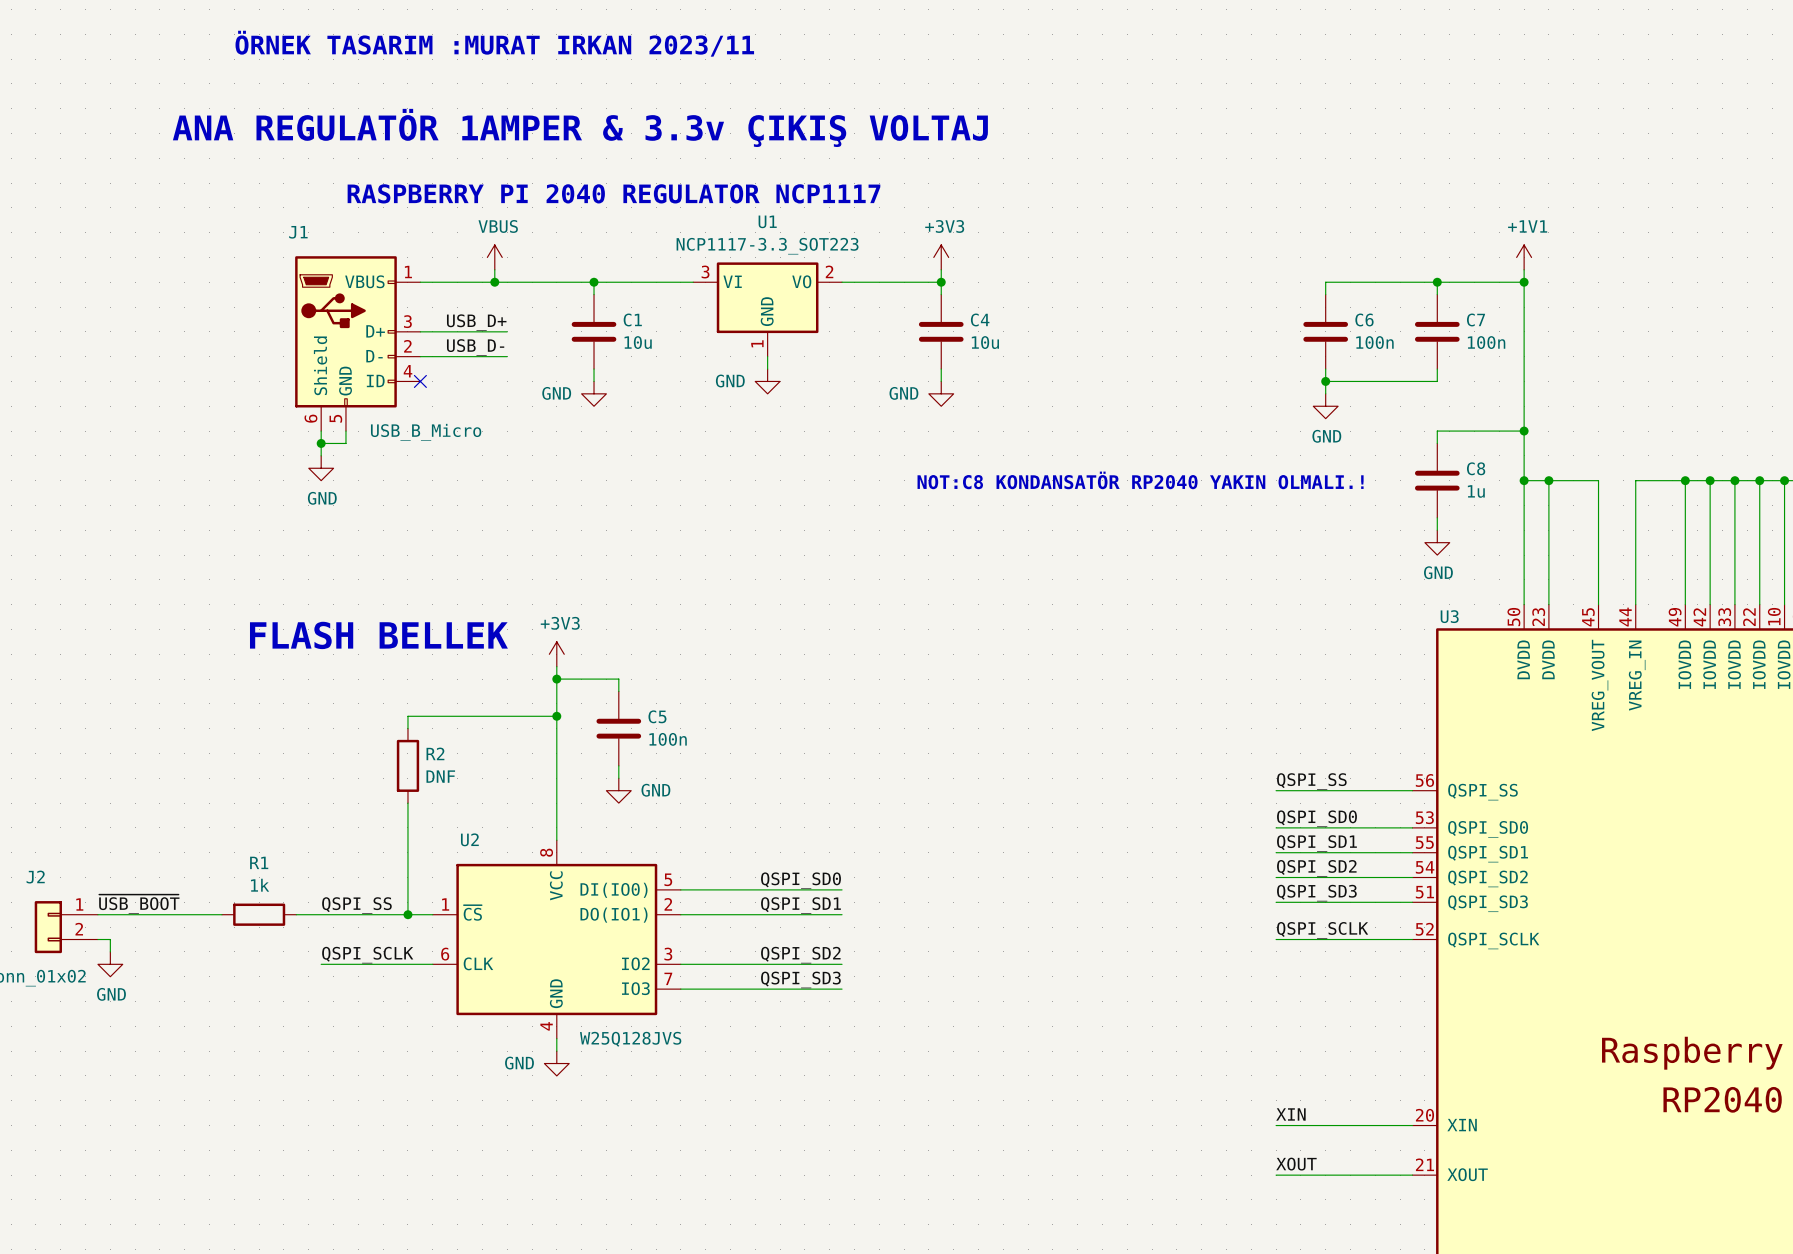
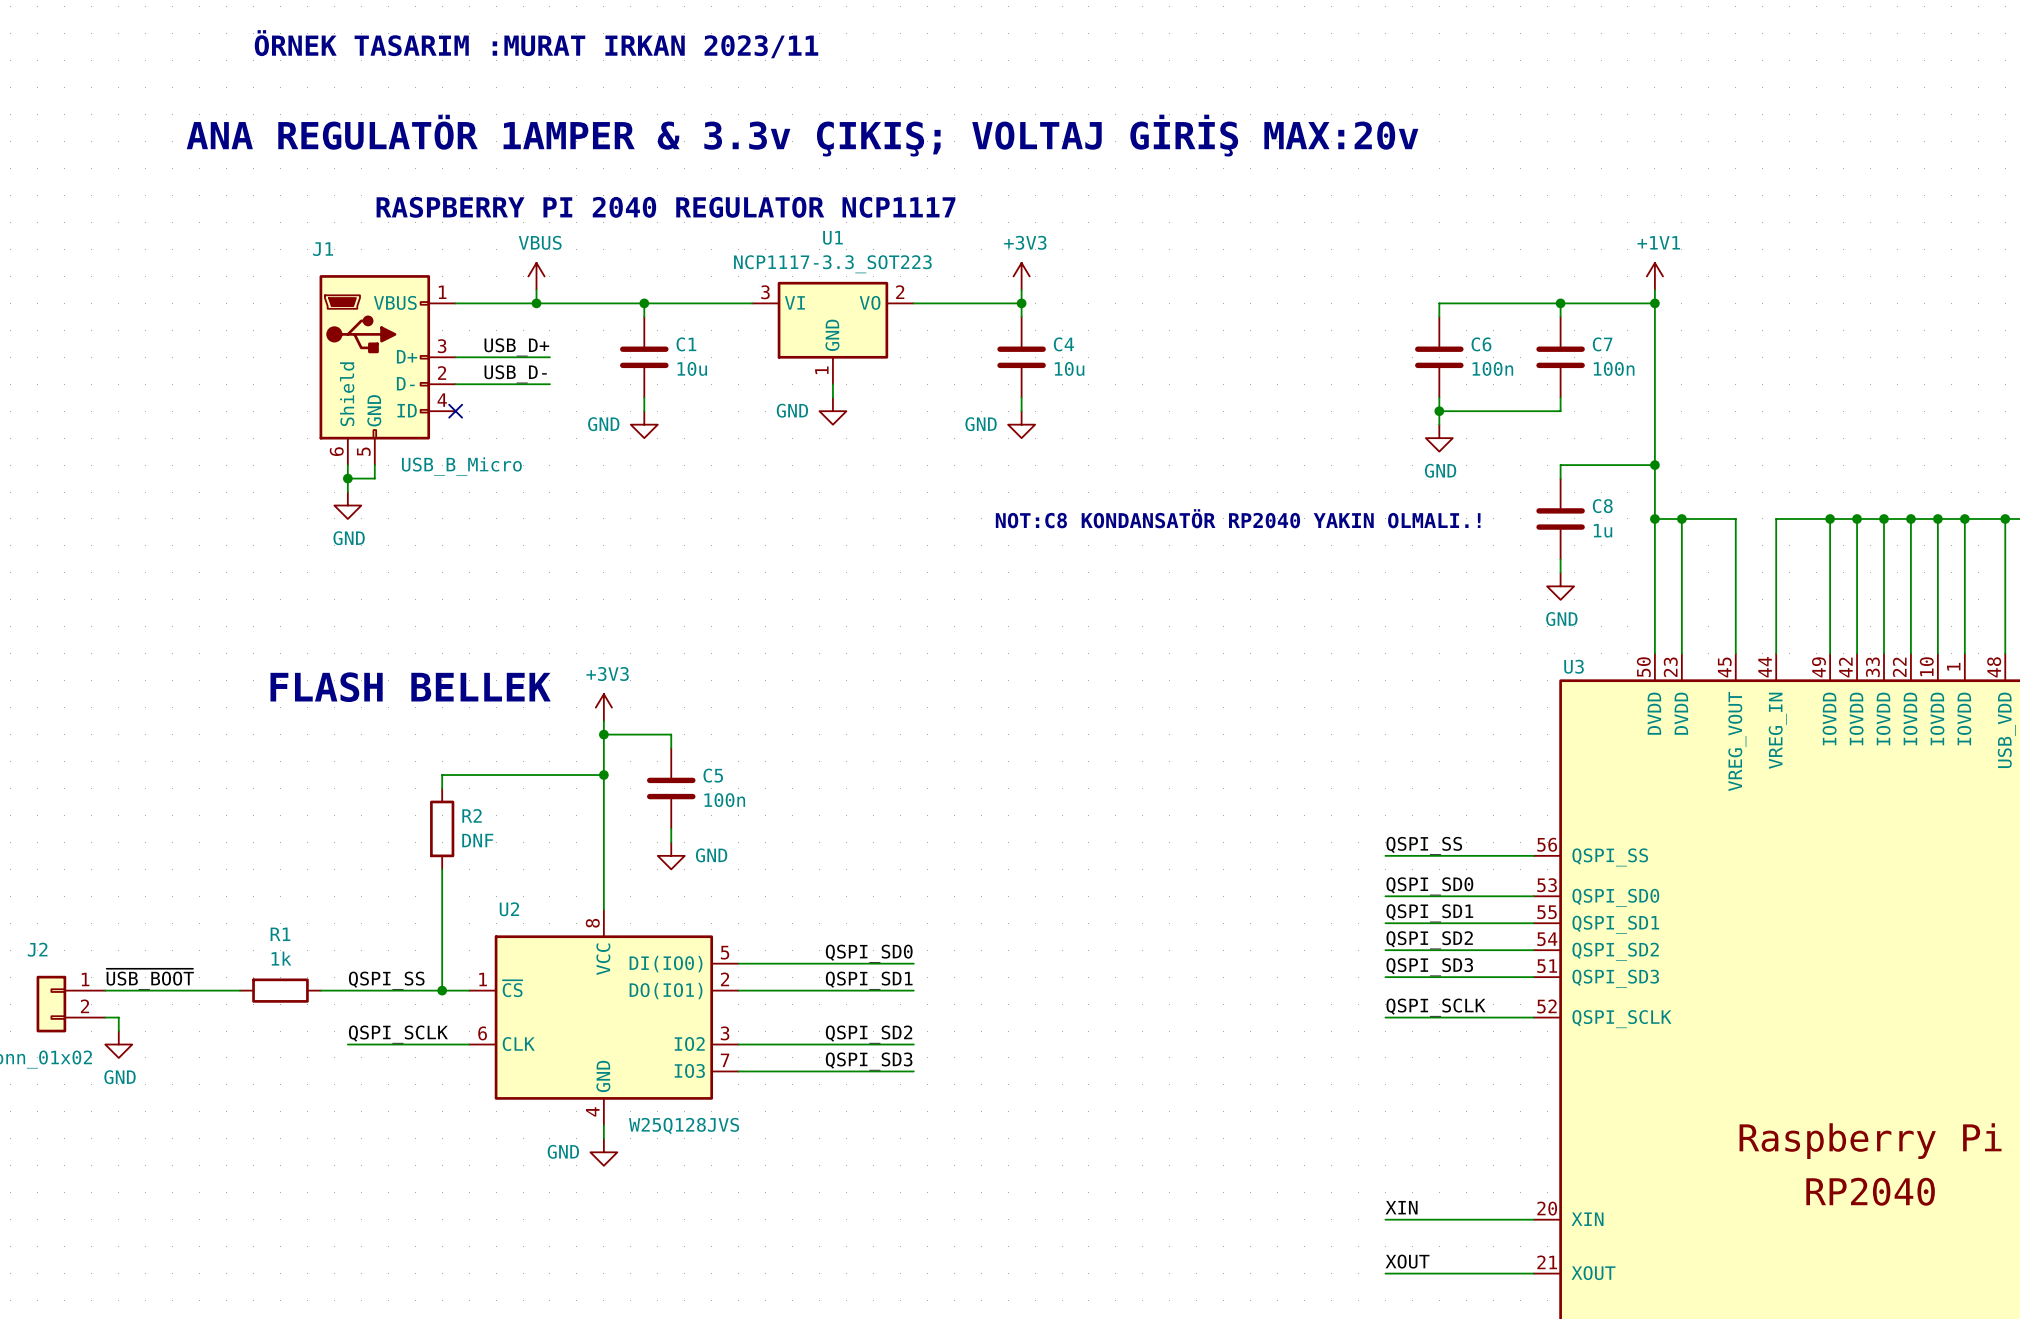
text: ANA REGULATÖR 1AMPER & 3.3v ÇIKIŞ VOLTAJ (580, 127) -> ANA REGULATÖR 1AMPER & 3.3v ÇIKIŞ; VOLTAJ GİRİŞ MAX:20v (802, 135)

